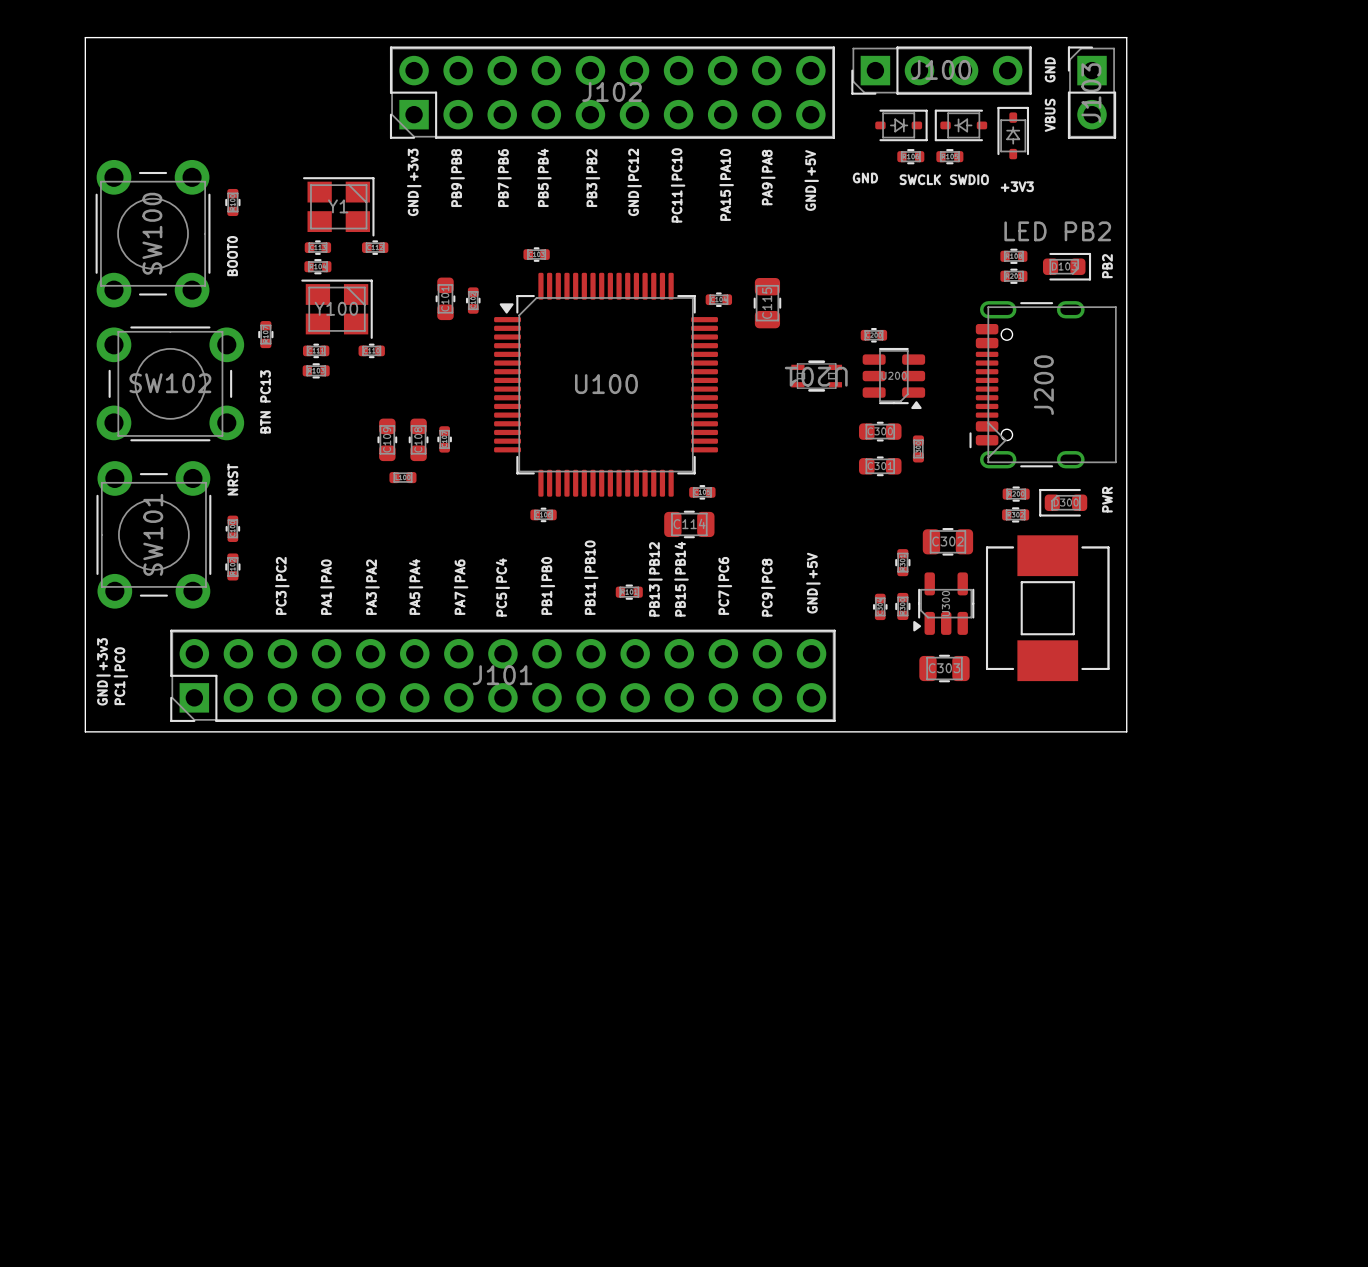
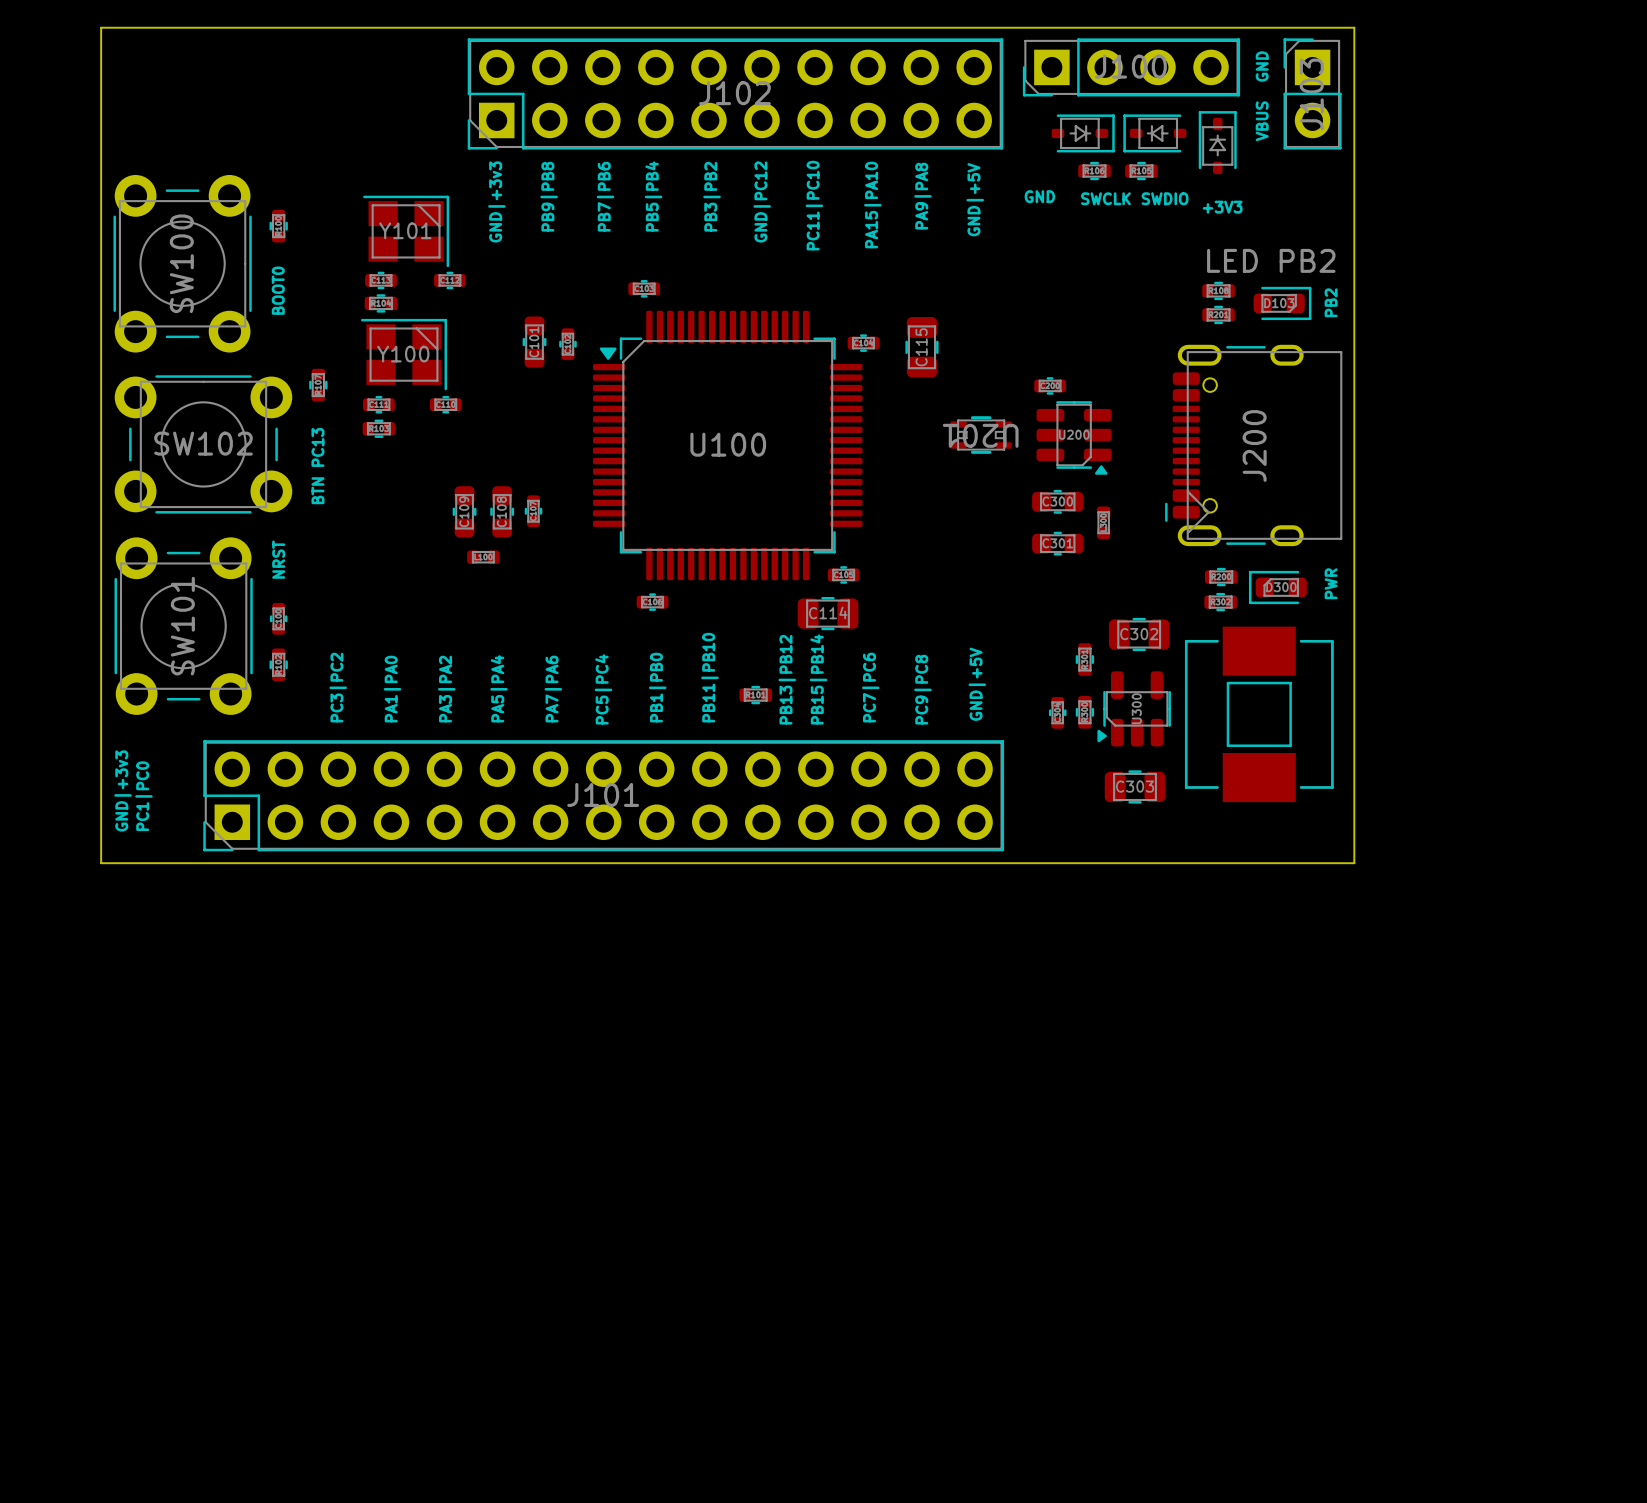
Y1 name: Y1 (338, 206) -> Y101 (405, 230)

